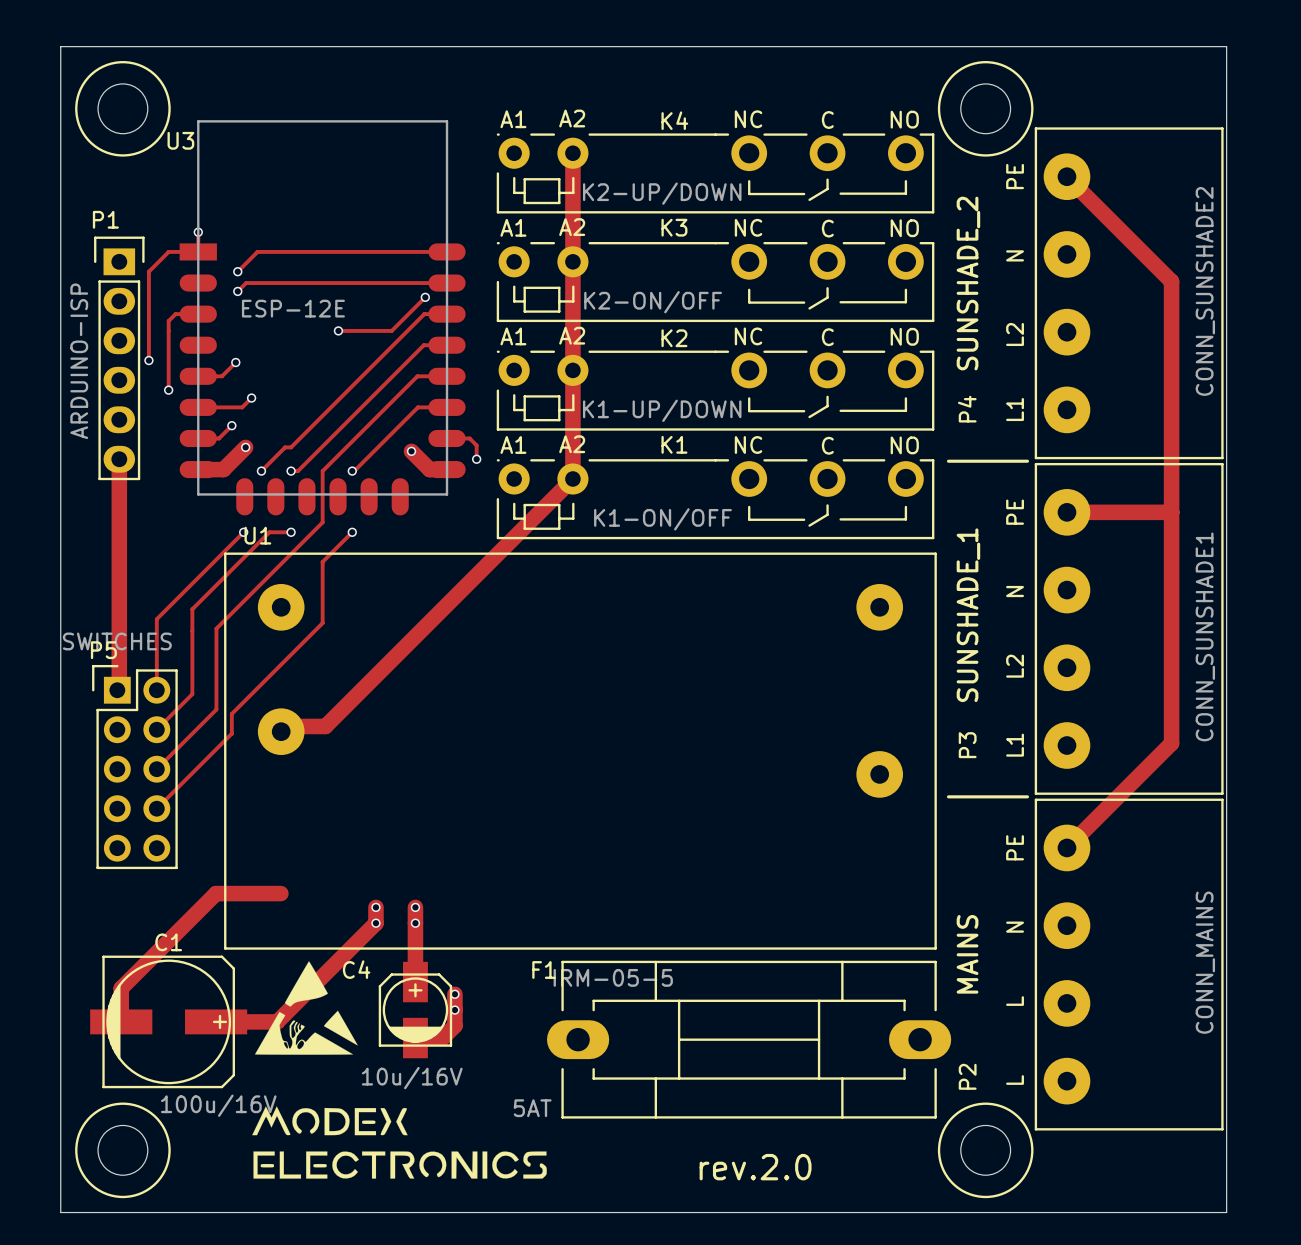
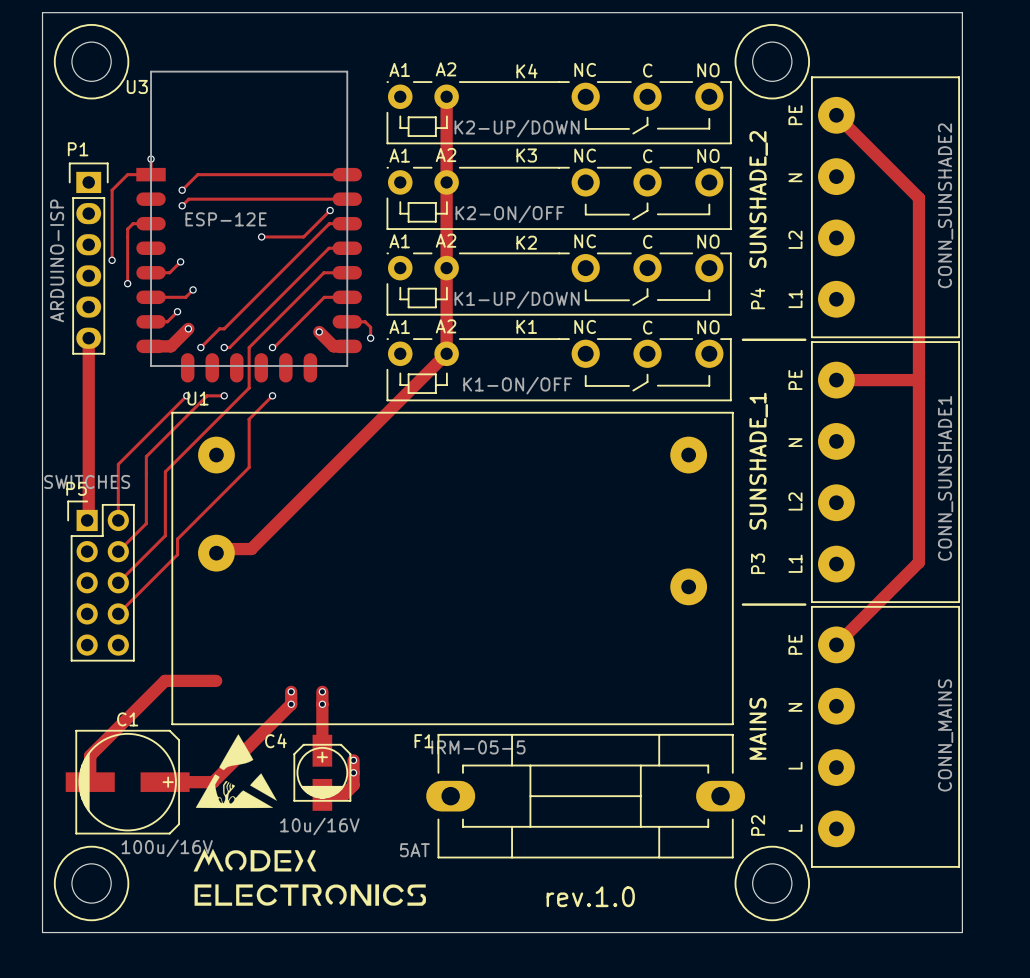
text: rev.2.0 (755, 1167) -> rev.1.0 (590, 896)

